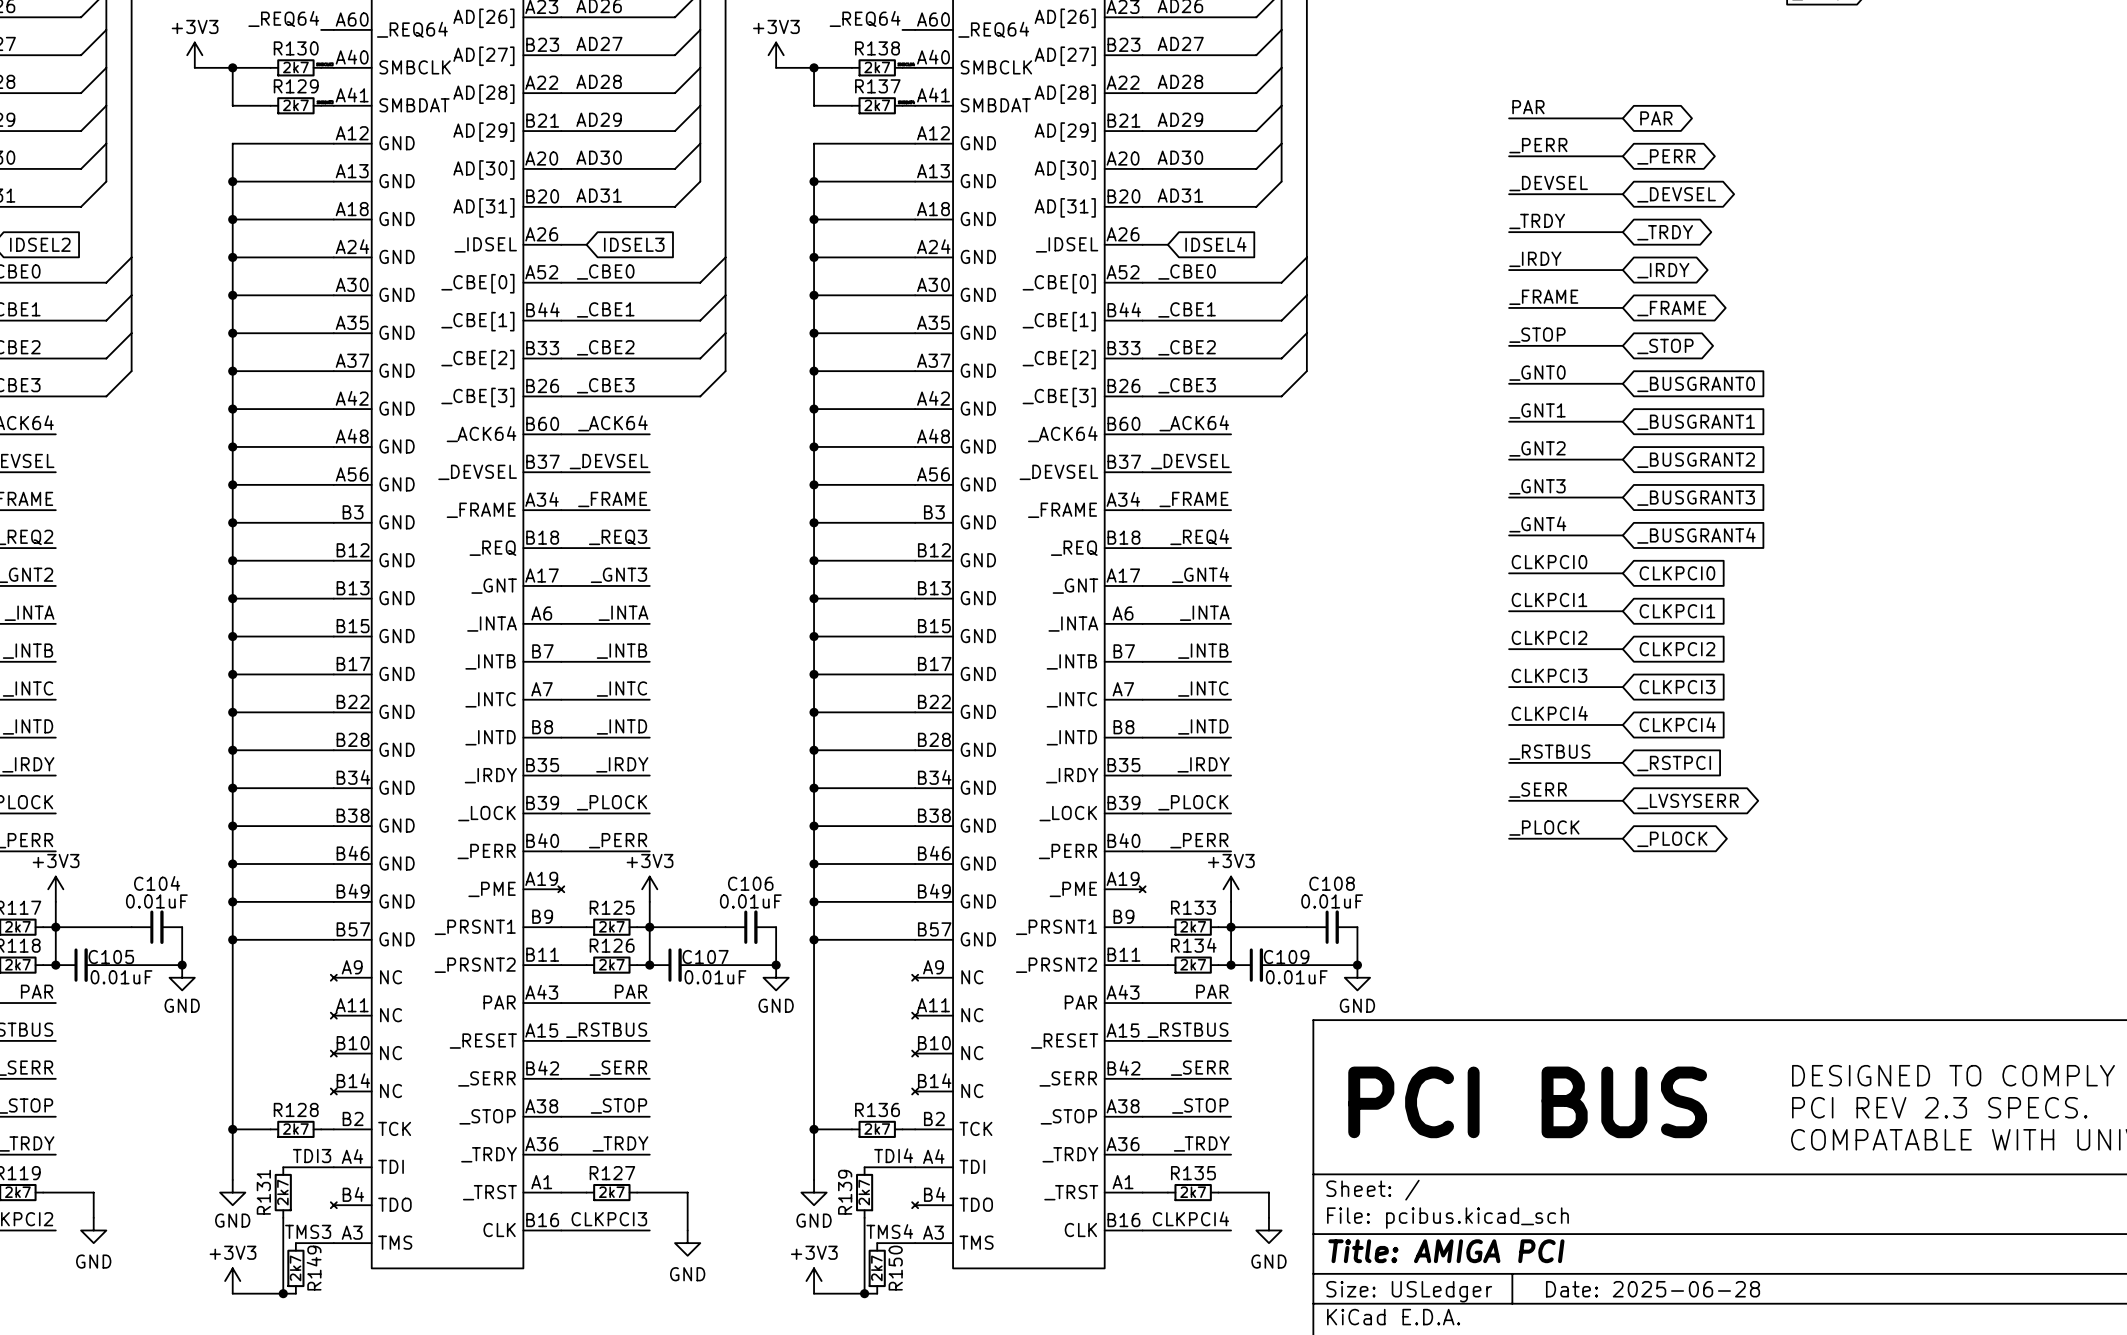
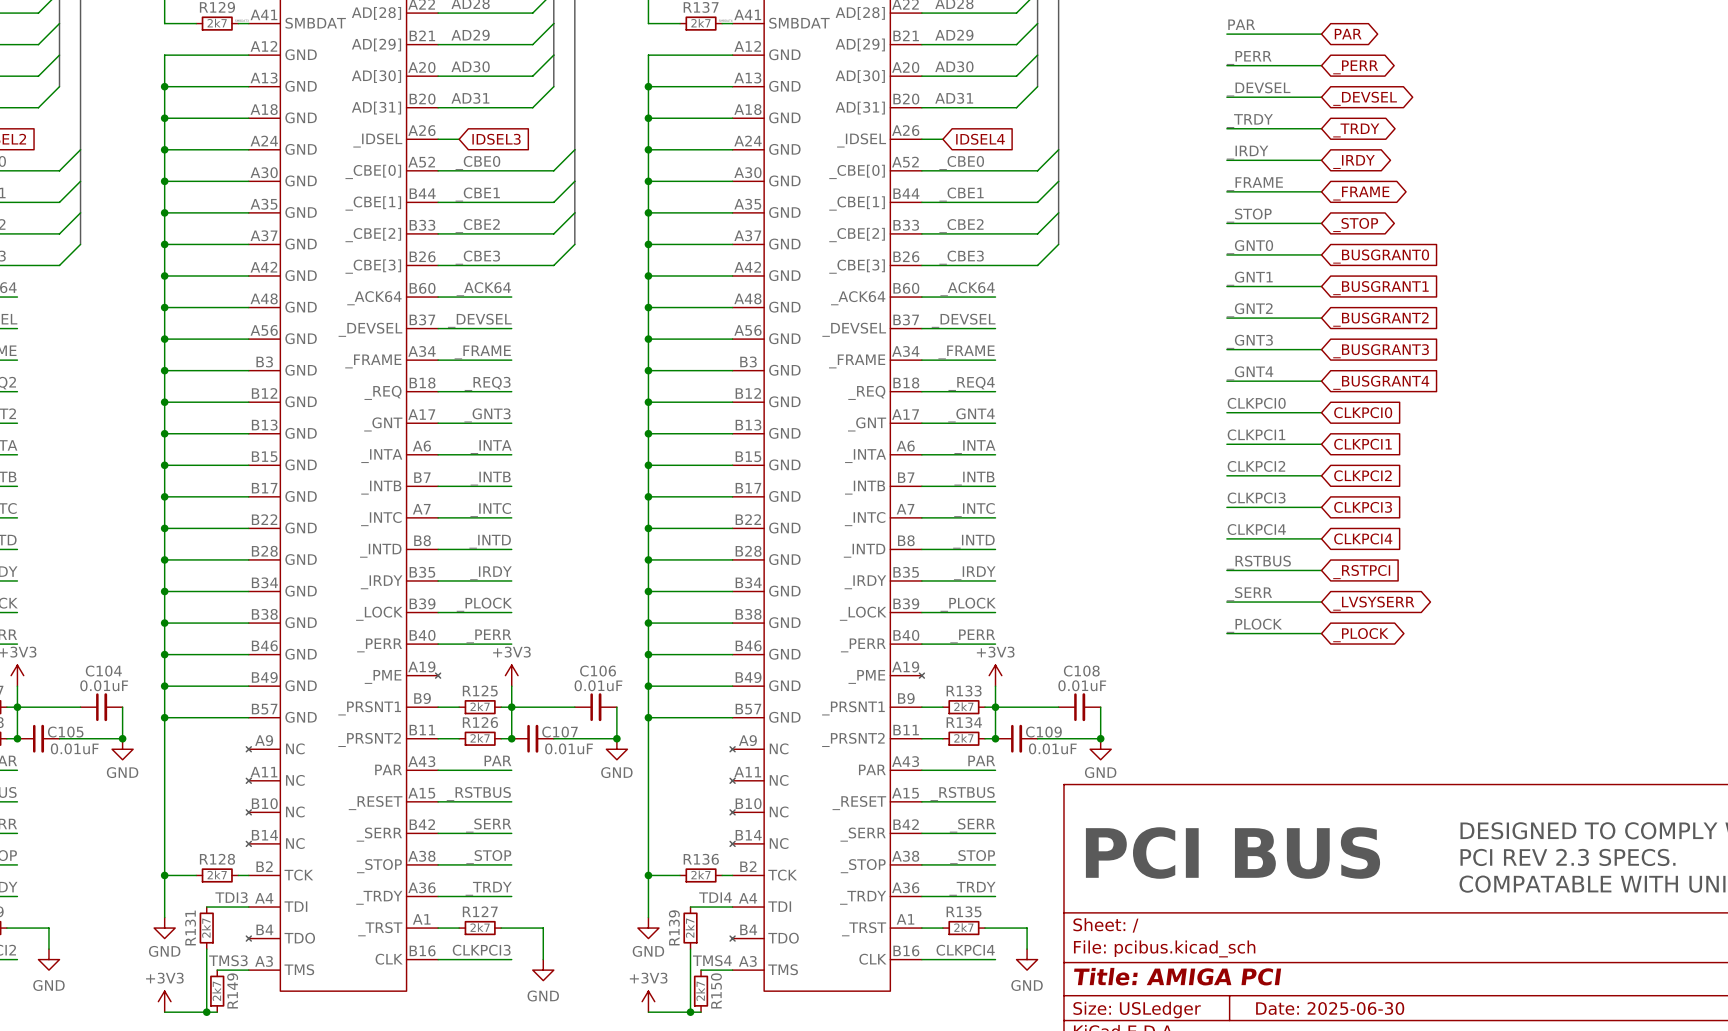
title block: Date: 2025-06-28 (1653, 1289) -> Date: 2025-06-30 (1330, 1008)

